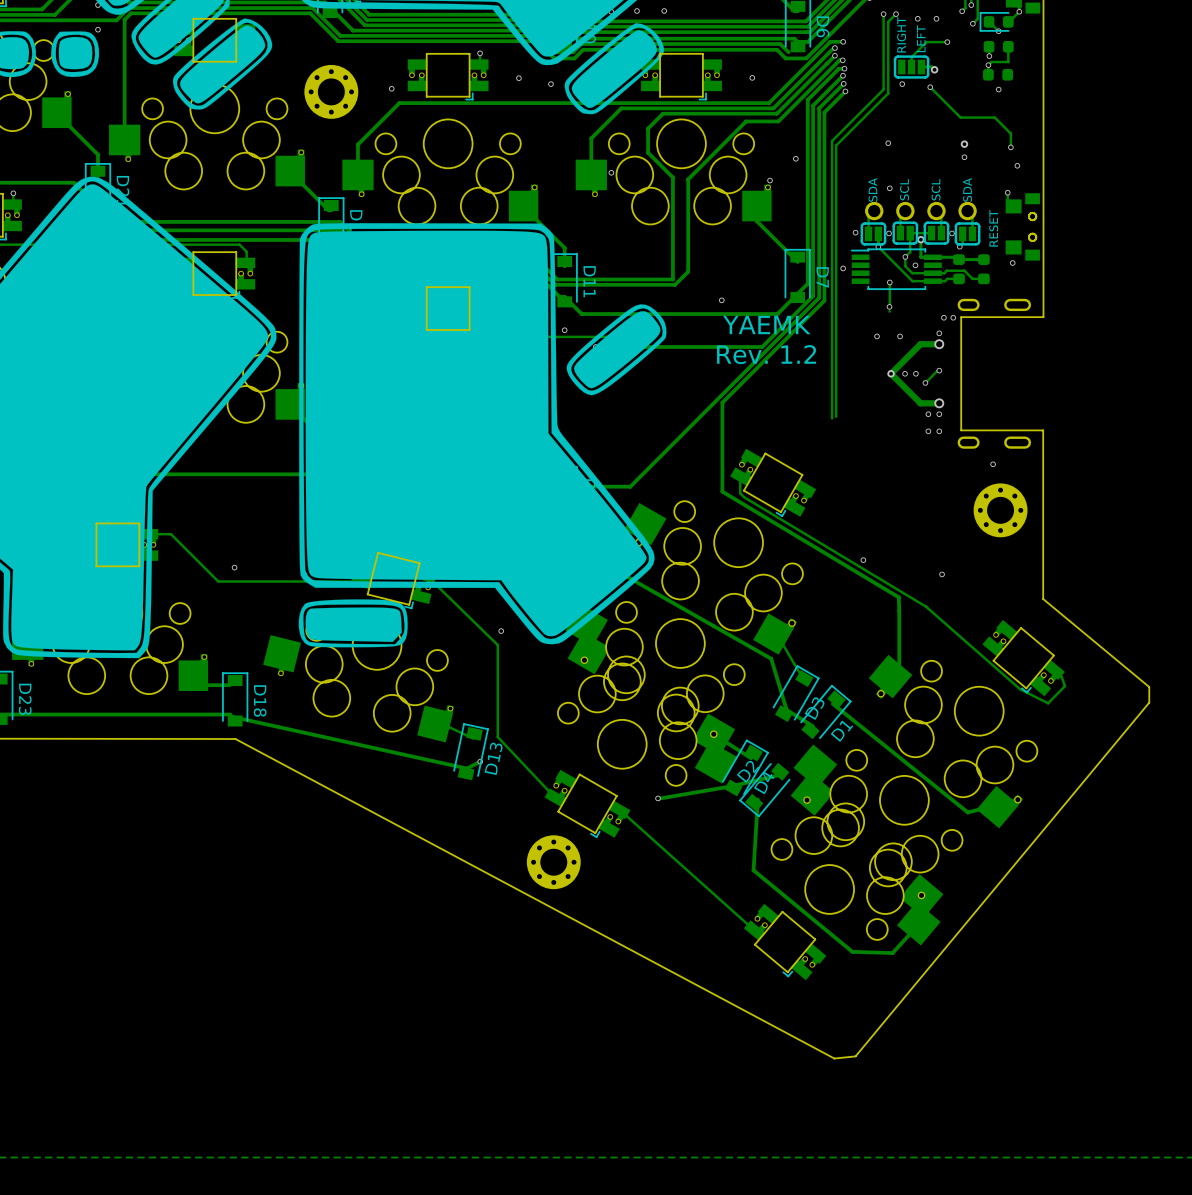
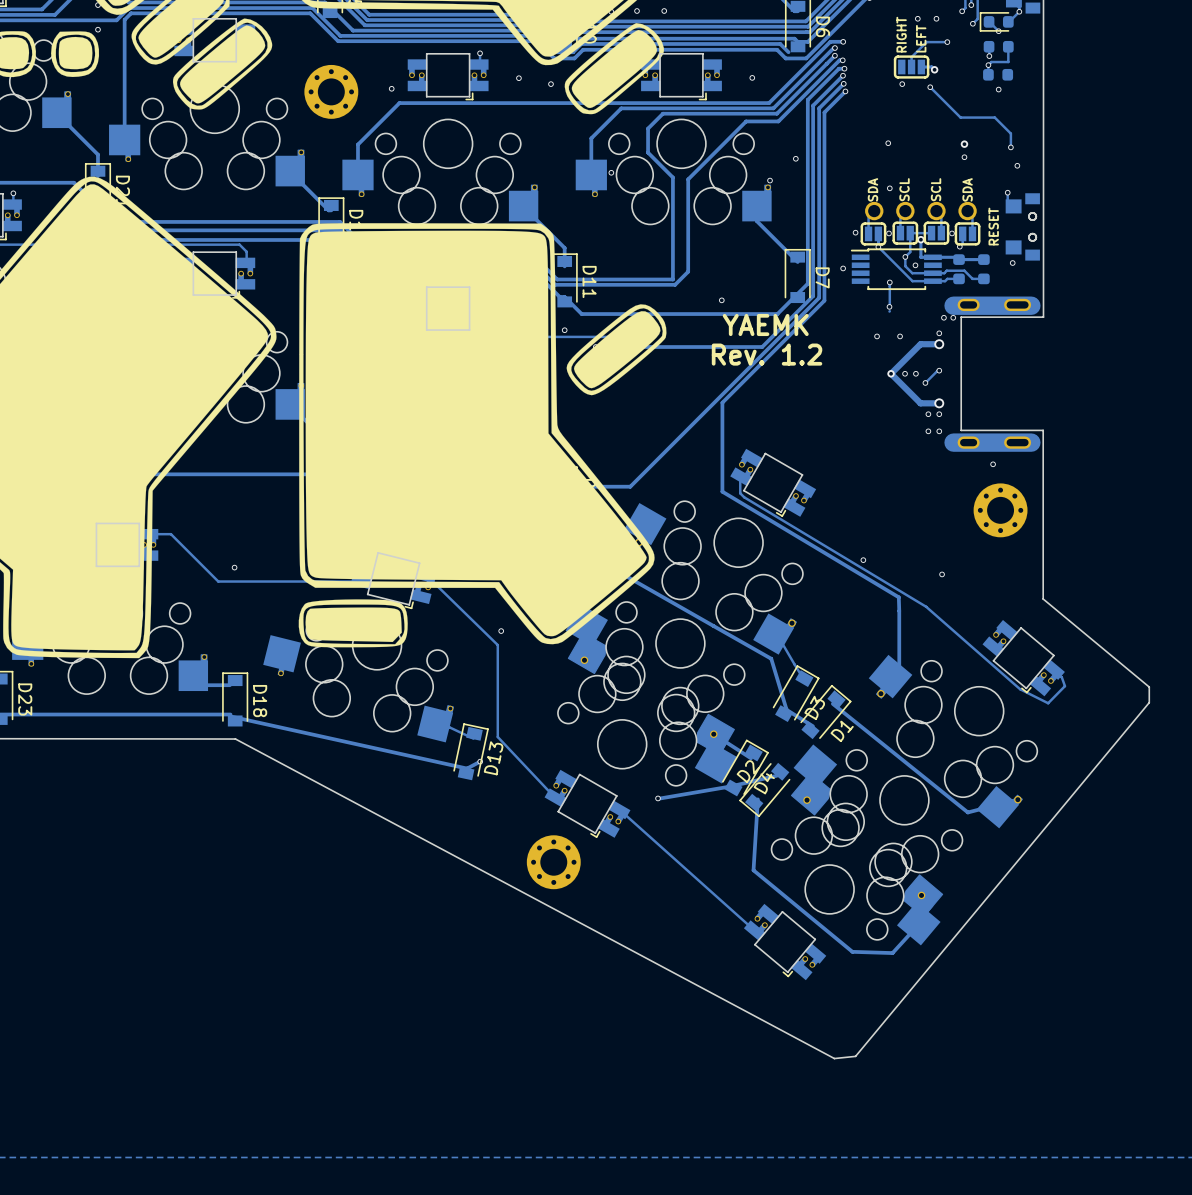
track: (883, 14) (883, 89) (832, 141) (832, 418) -> none
via: (883, 14) -> none
track: (896, 14) (888, 21) (888, 93) (836, 145) (836, 416) -> none
via: (896, 14) -> none
track: none -> (1031, 305) (953, 305)
track: none -> (1031, 442) (953, 442)

